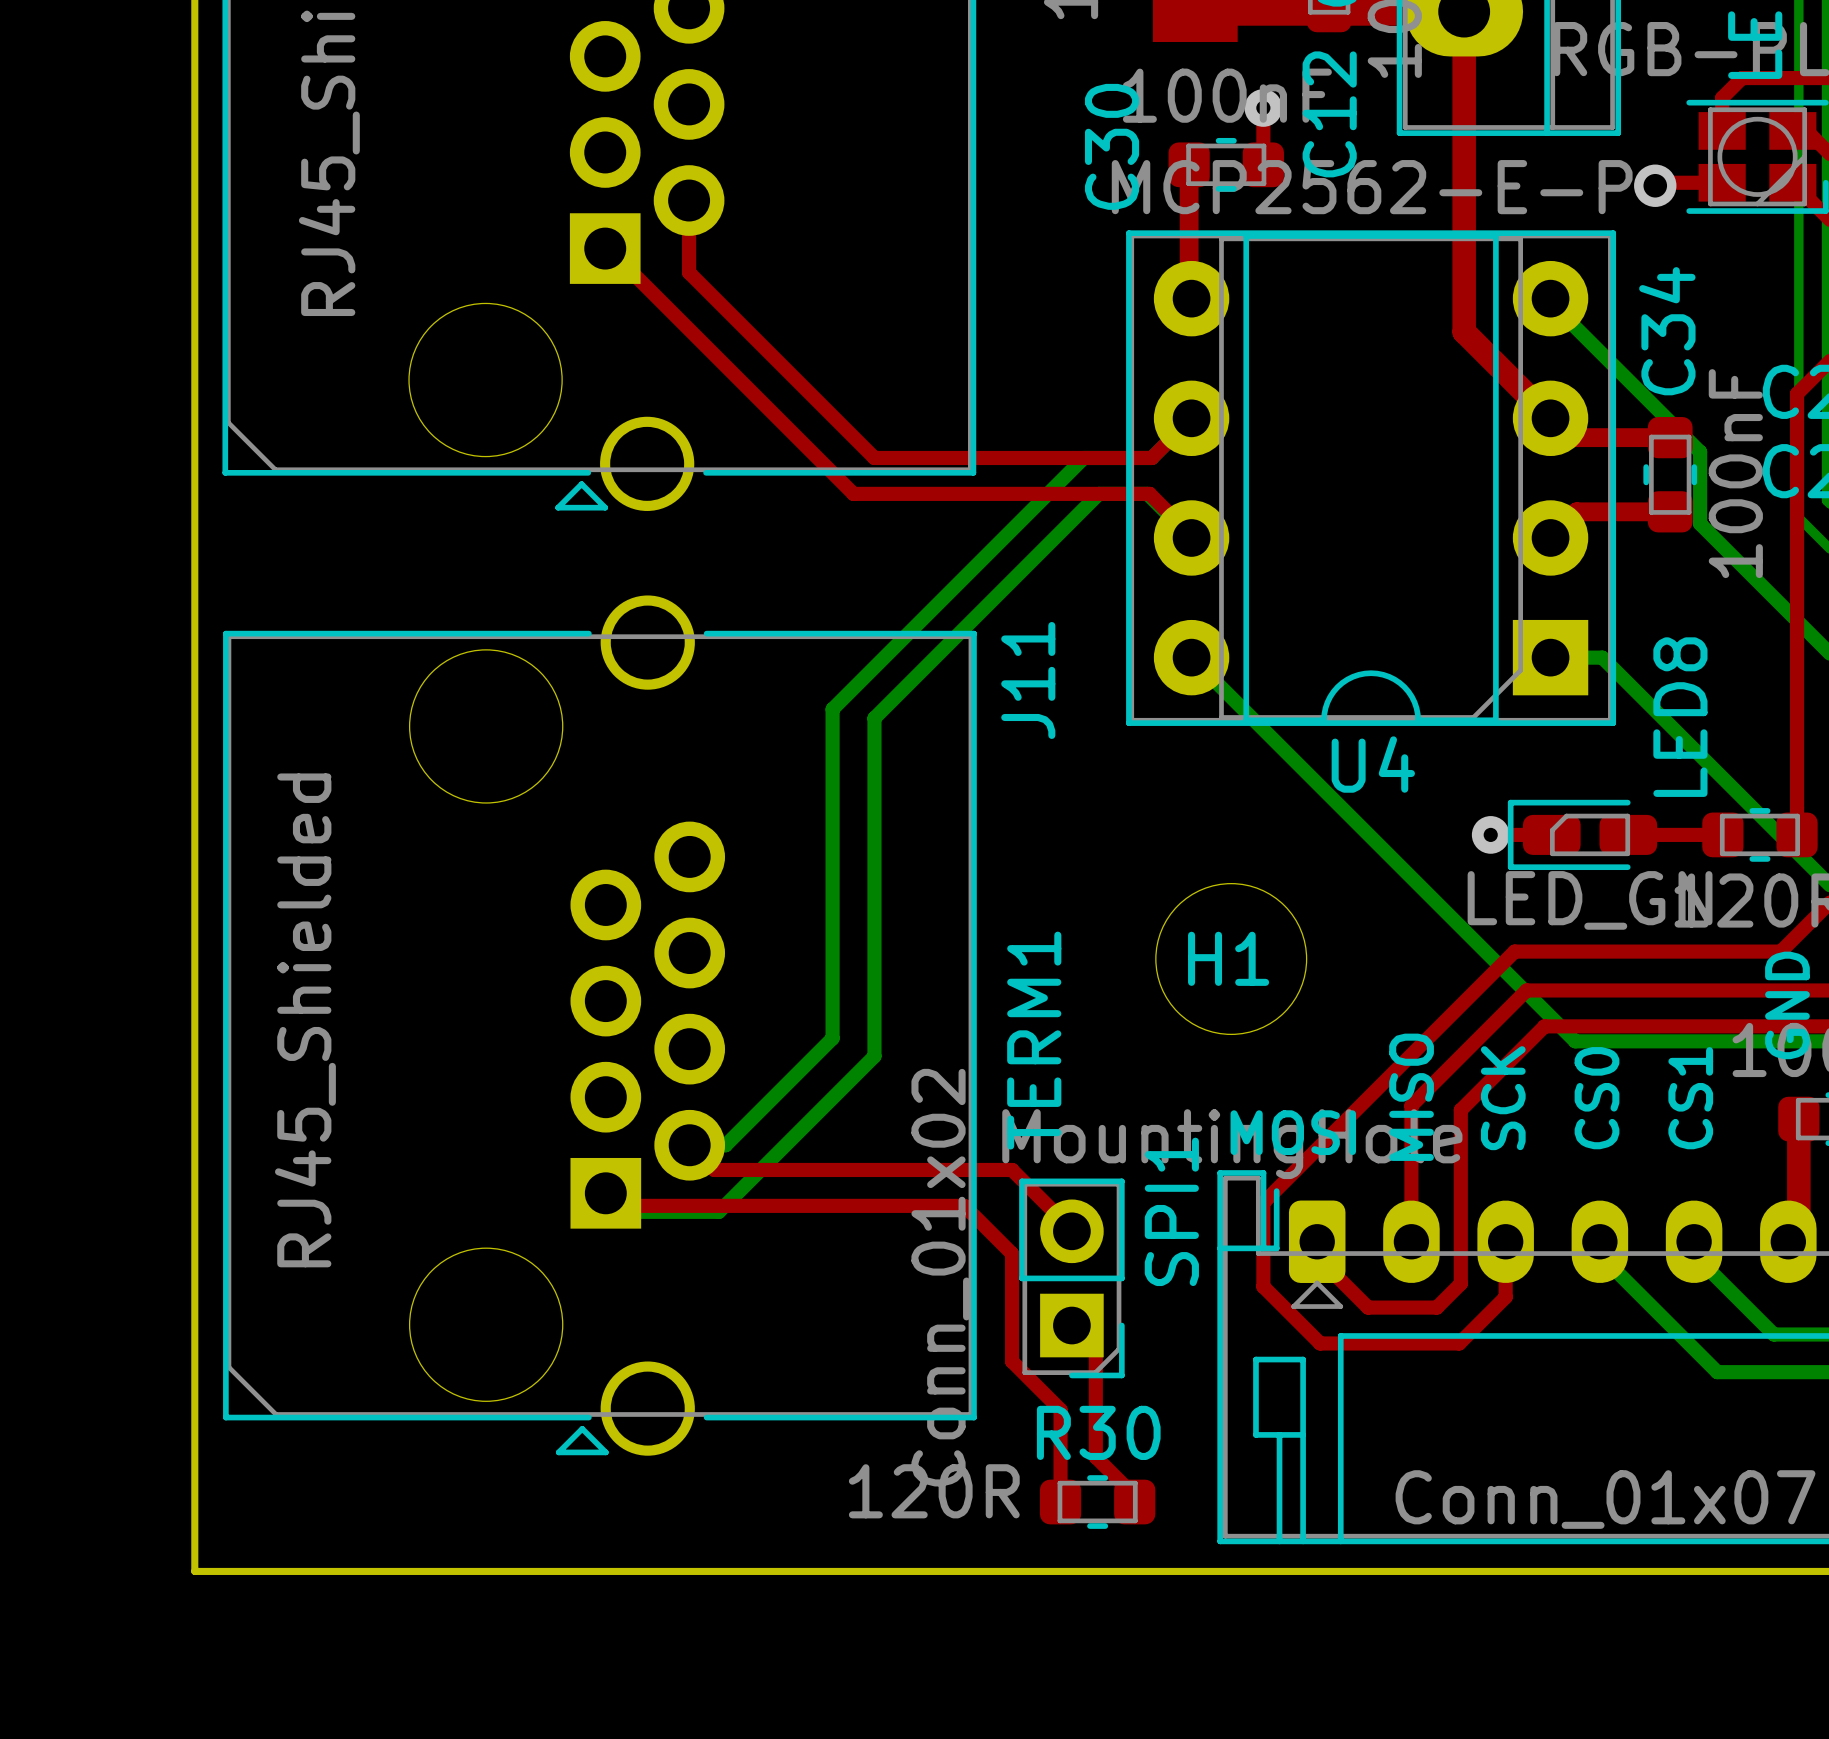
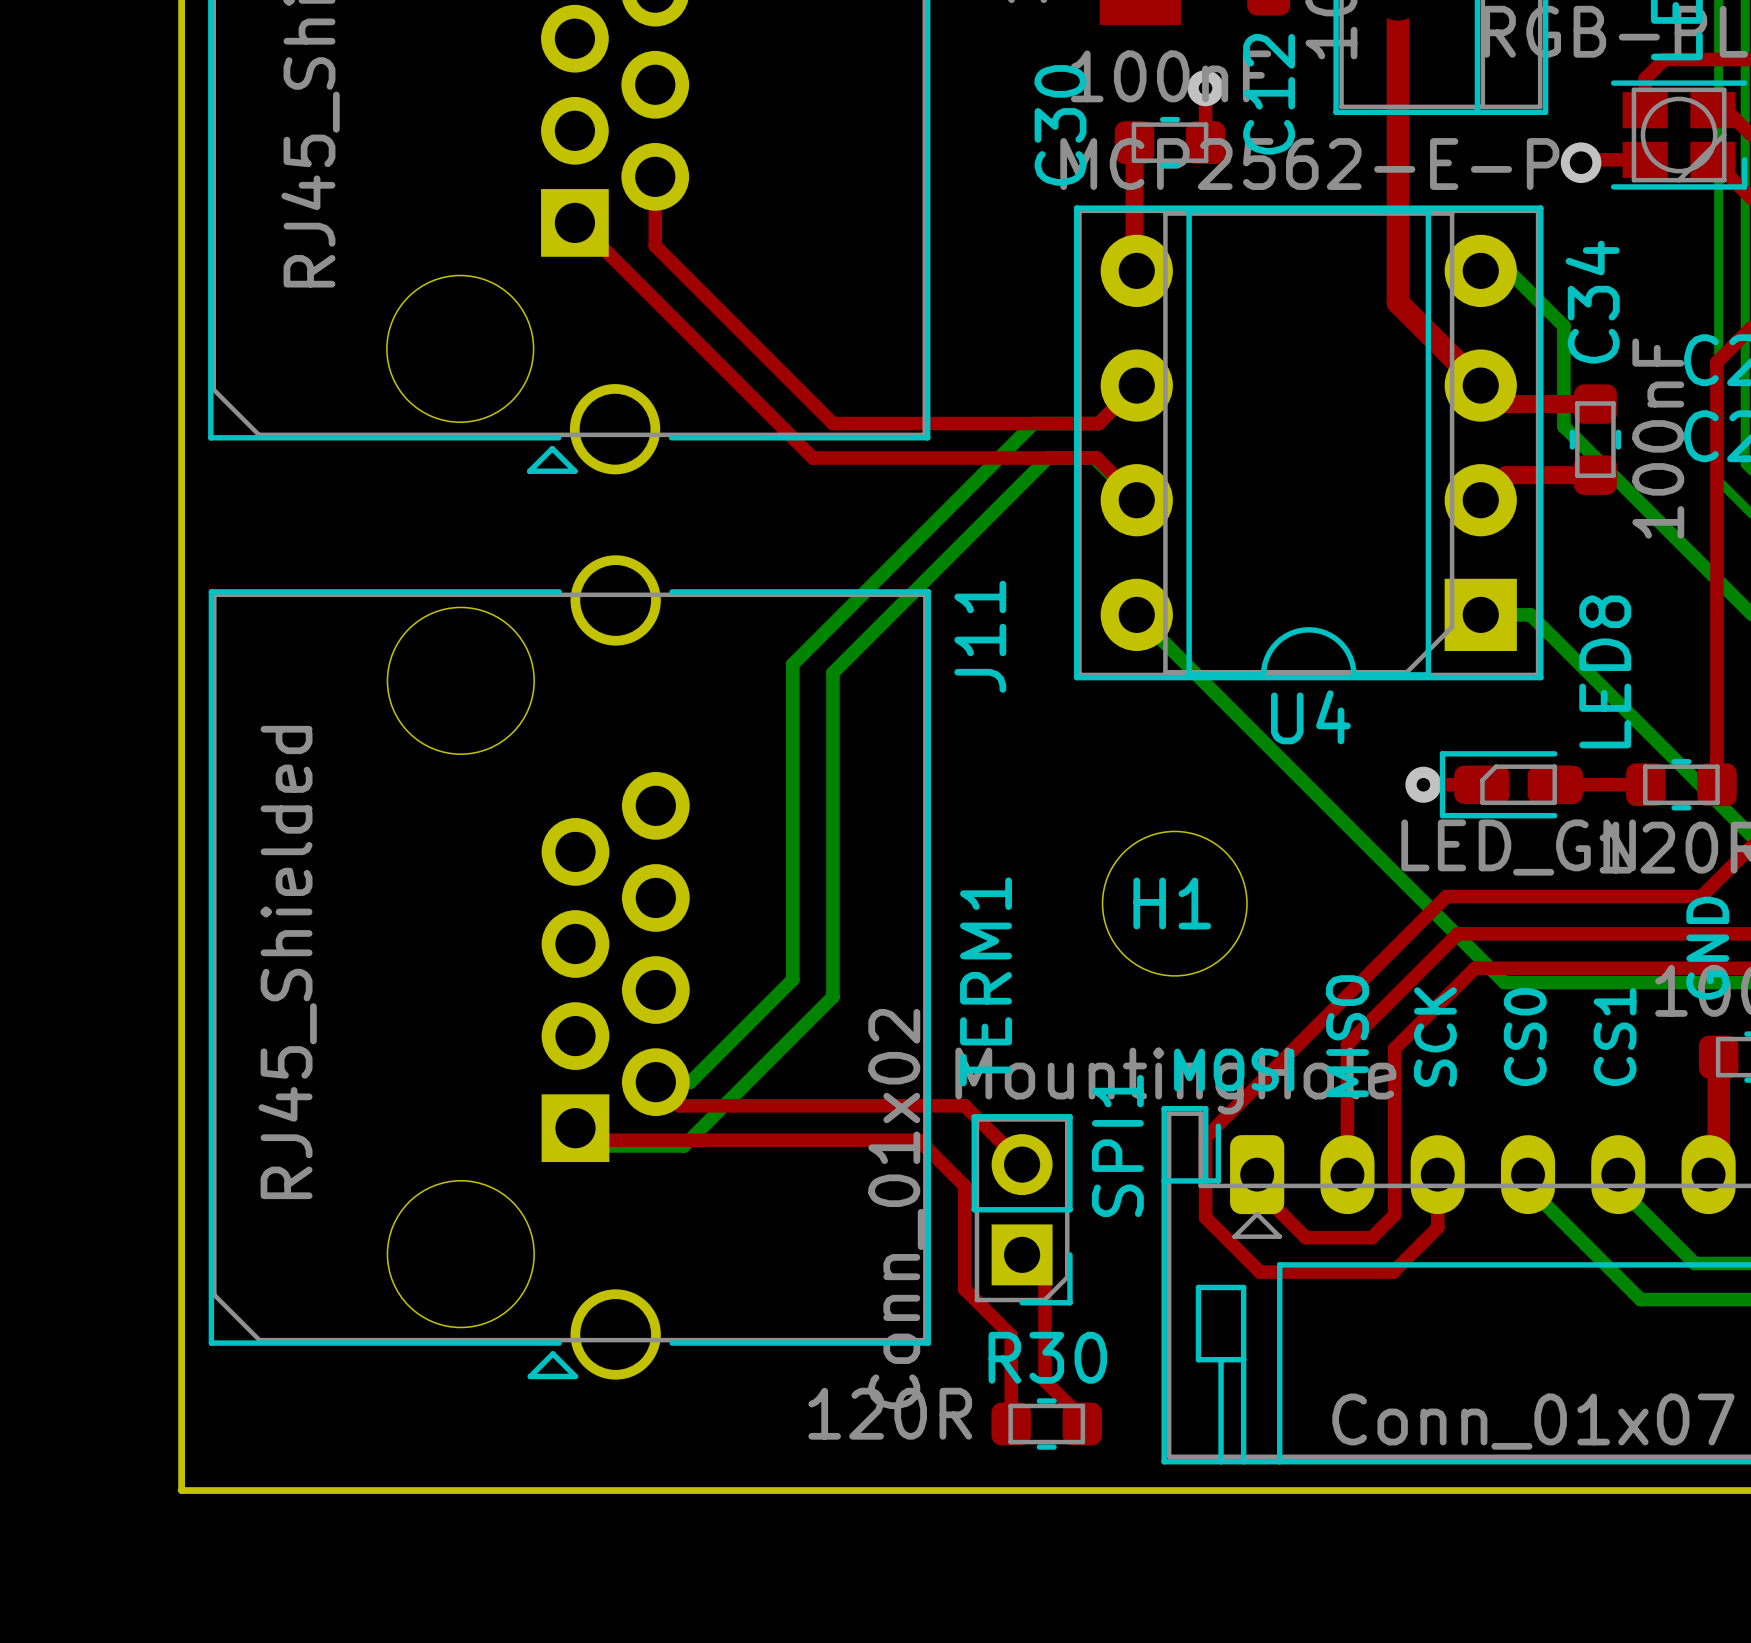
bottom track: (1550, 298) (1550, 302) (1700, 452) (1700, 523) -> (1480, 270) (1508, 270) (1563, 326) (1563, 426) (1624, 486)

